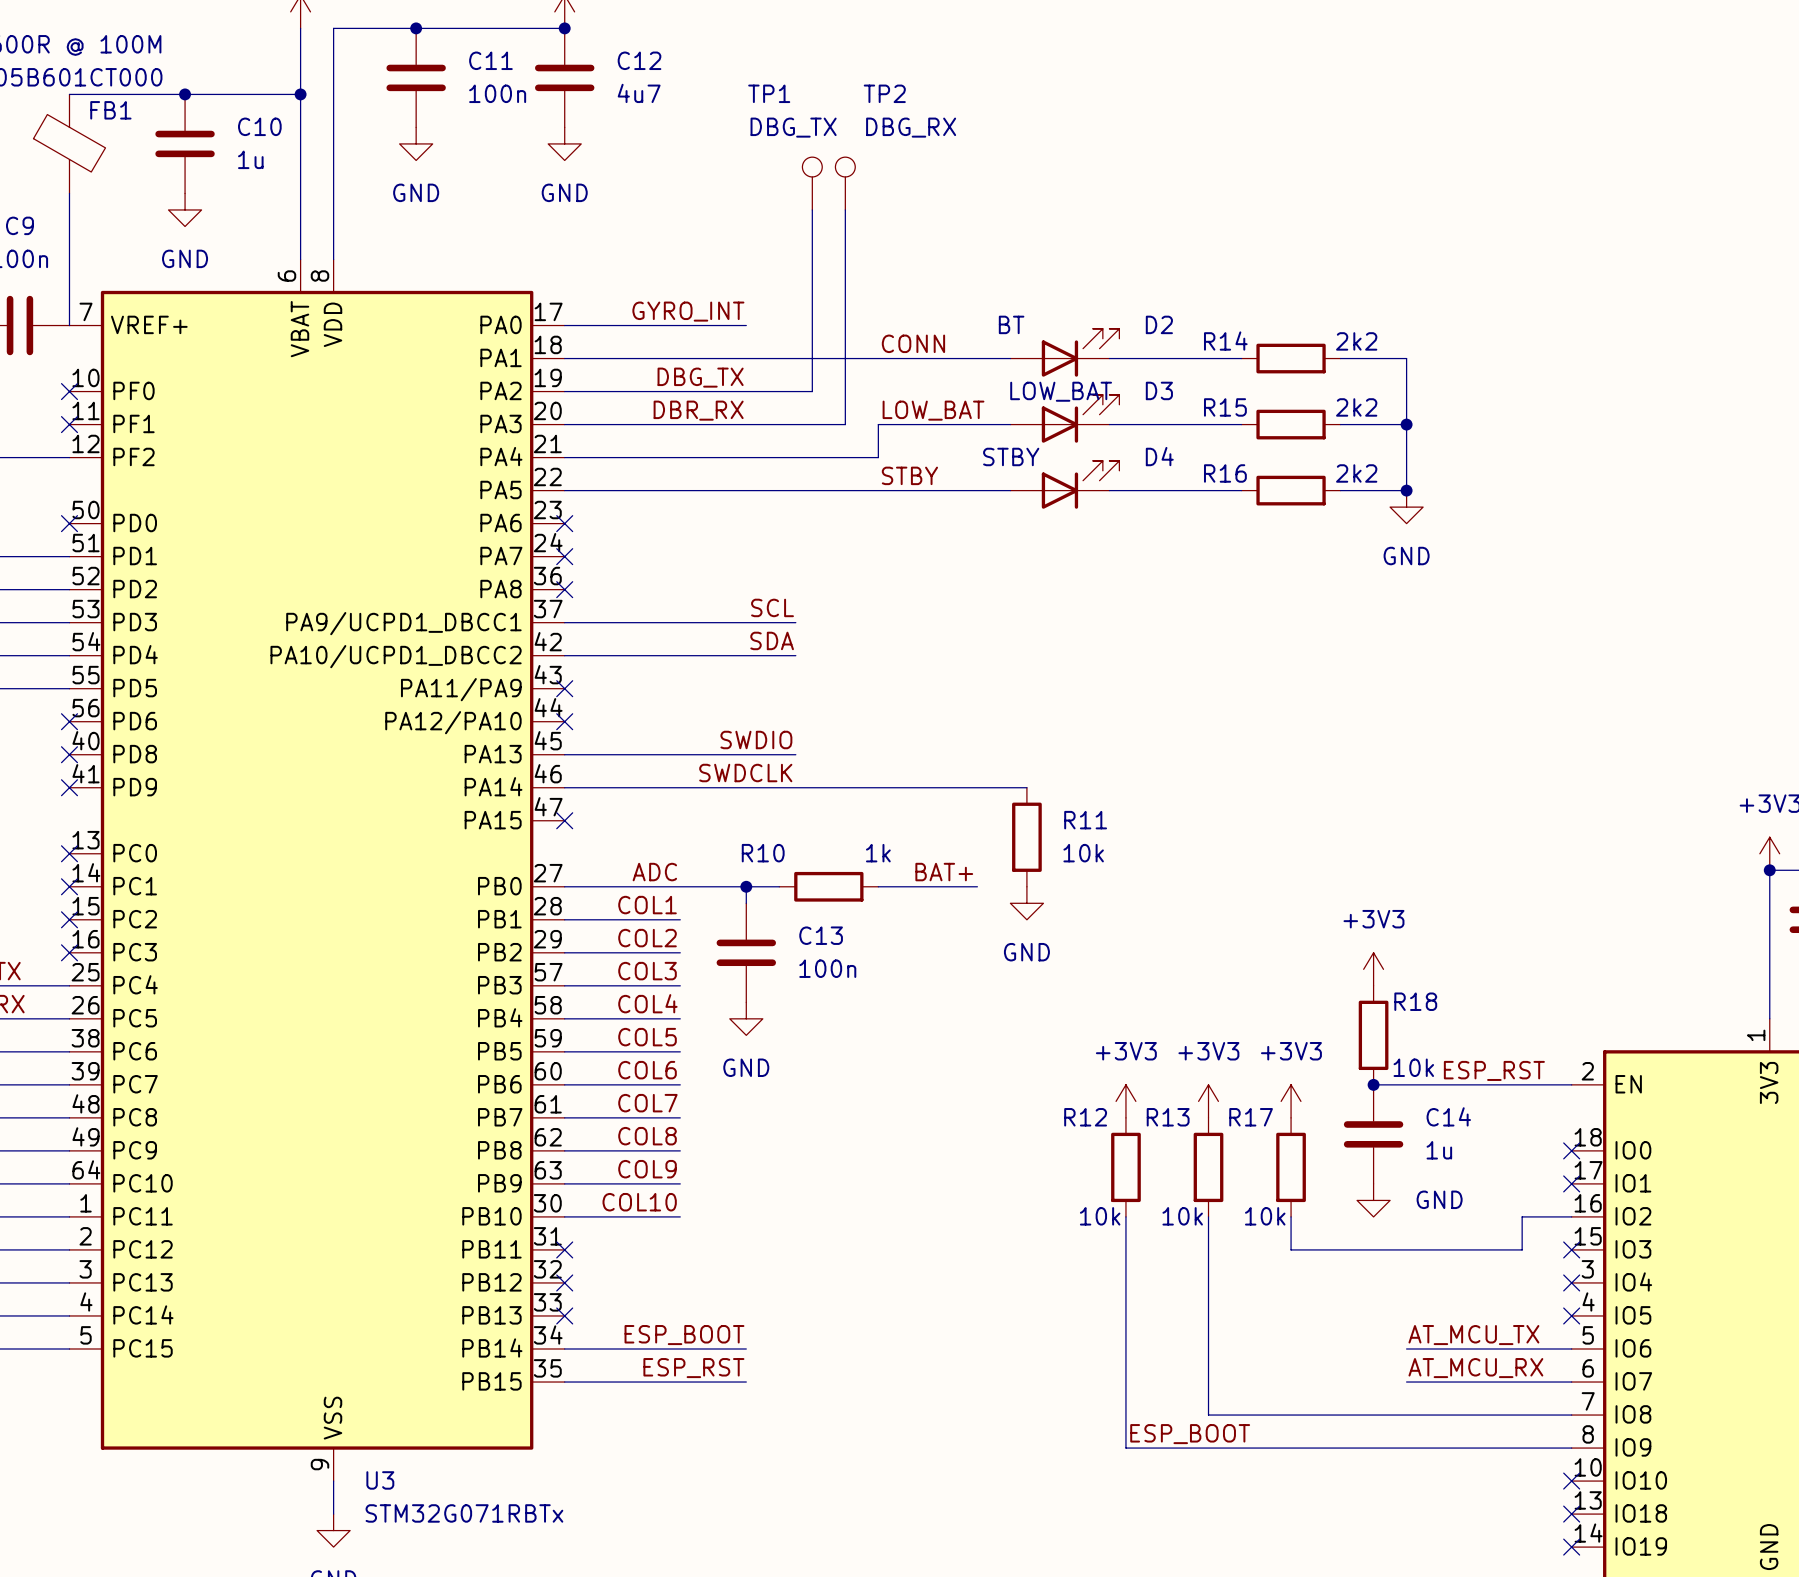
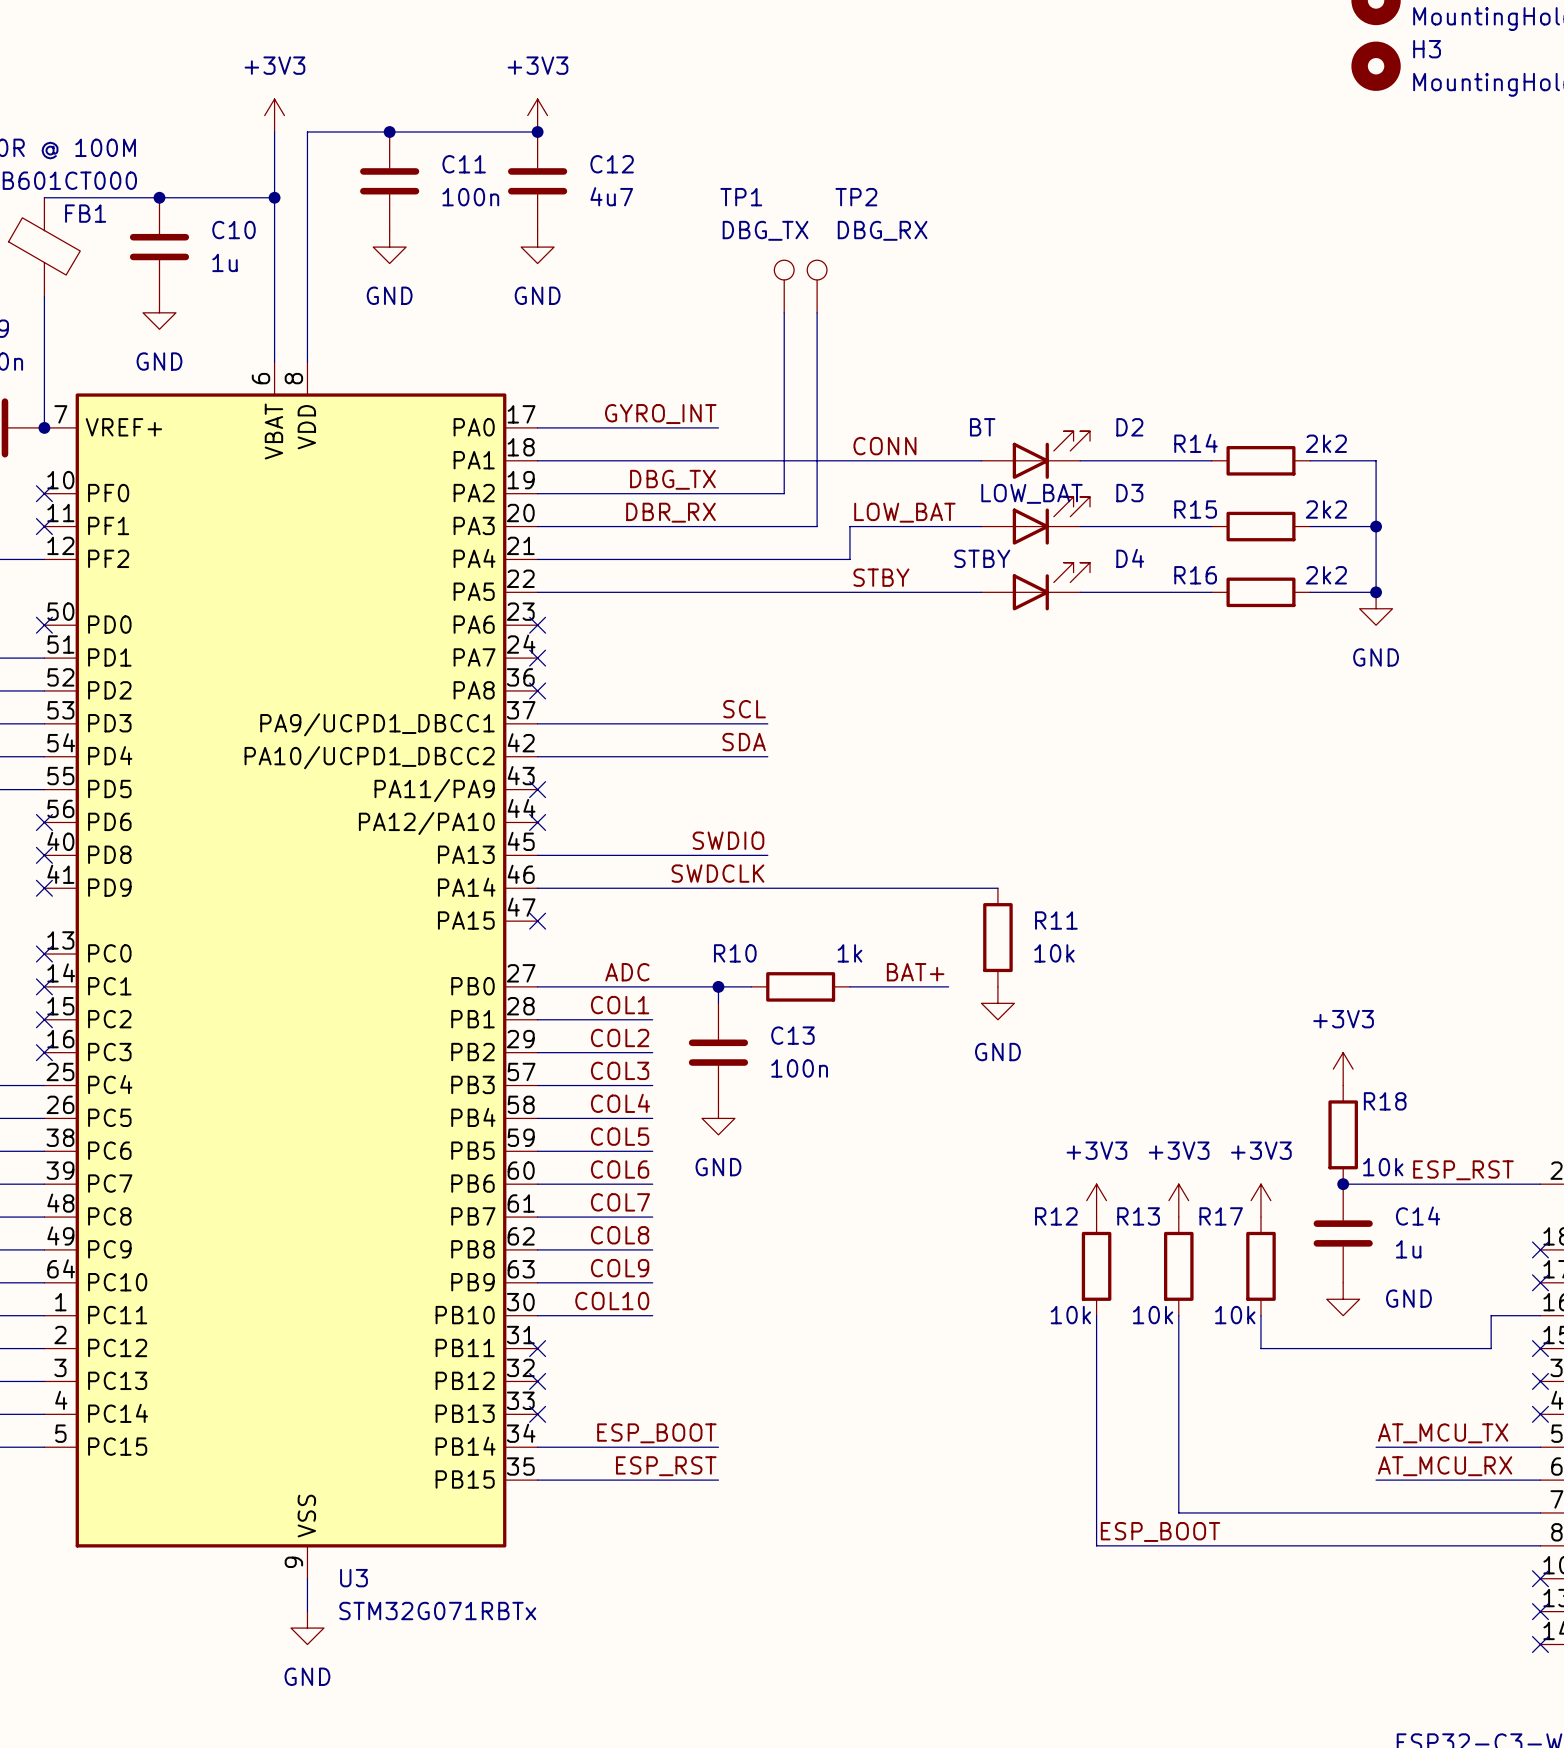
junction: none -> (44, 427)

